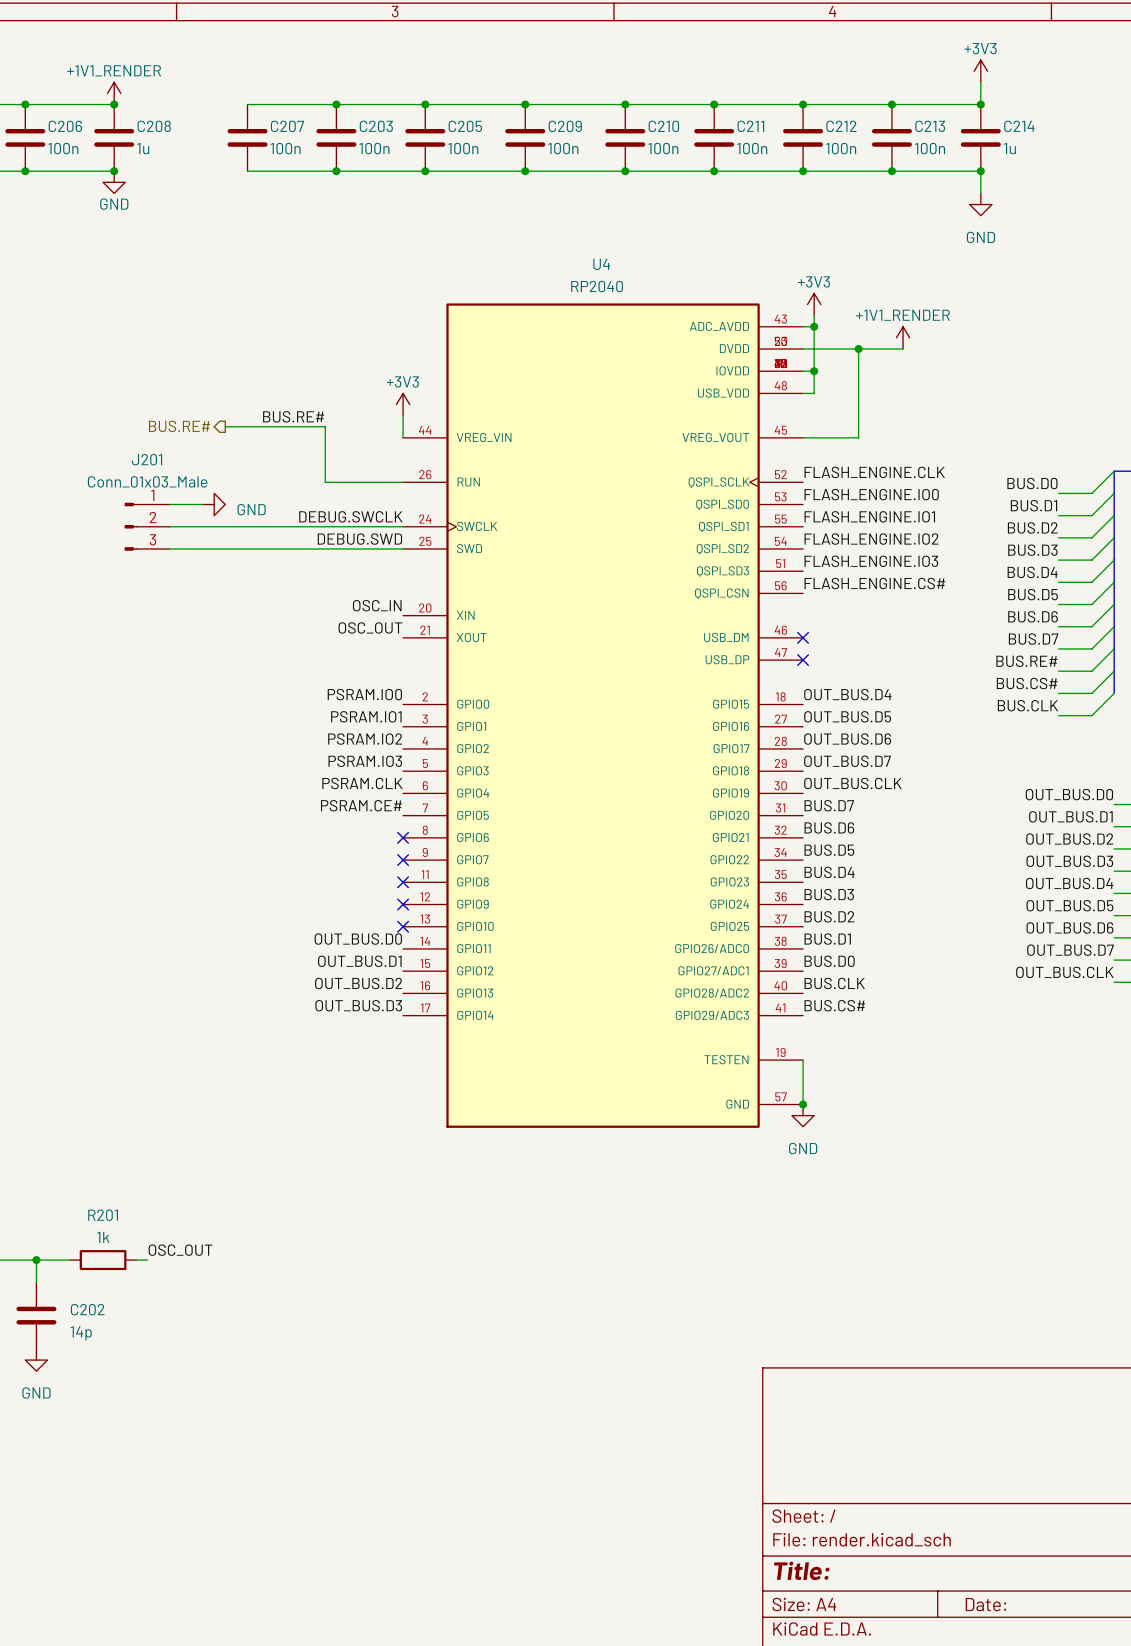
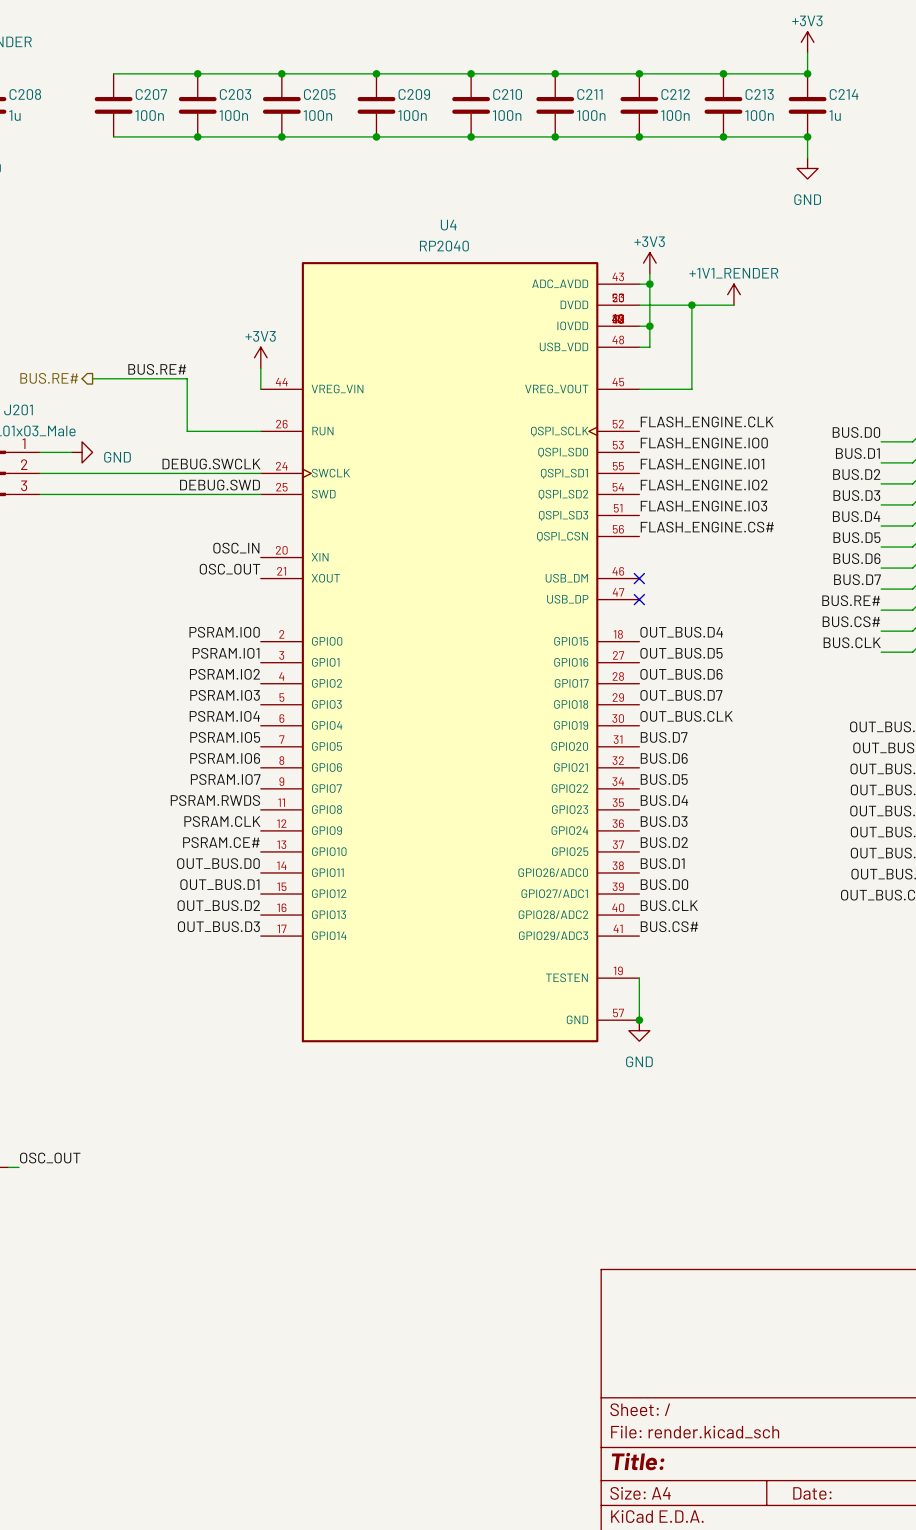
label: PSRAM.CLK (362, 783) -> PSRAM.IO4 (224, 716)
label: PSRAM.CE# (361, 805) -> PSRAM.IO5 (225, 737)
label: none -> PSRAM.IO6 (225, 758)
no-connect mark: (403, 837) -> none
label: none -> PSRAM.IO7 (225, 779)
no-connect mark: (403, 860) -> none
label: none -> PSRAM.RWDS (215, 800)
no-connect mark: (403, 882) -> none
label: none -> PSRAM.CLK (222, 821)
no-connect mark: (403, 904) -> none
label: none -> PSRAM.CE# (221, 842)
no-connect mark: (403, 926) -> none

